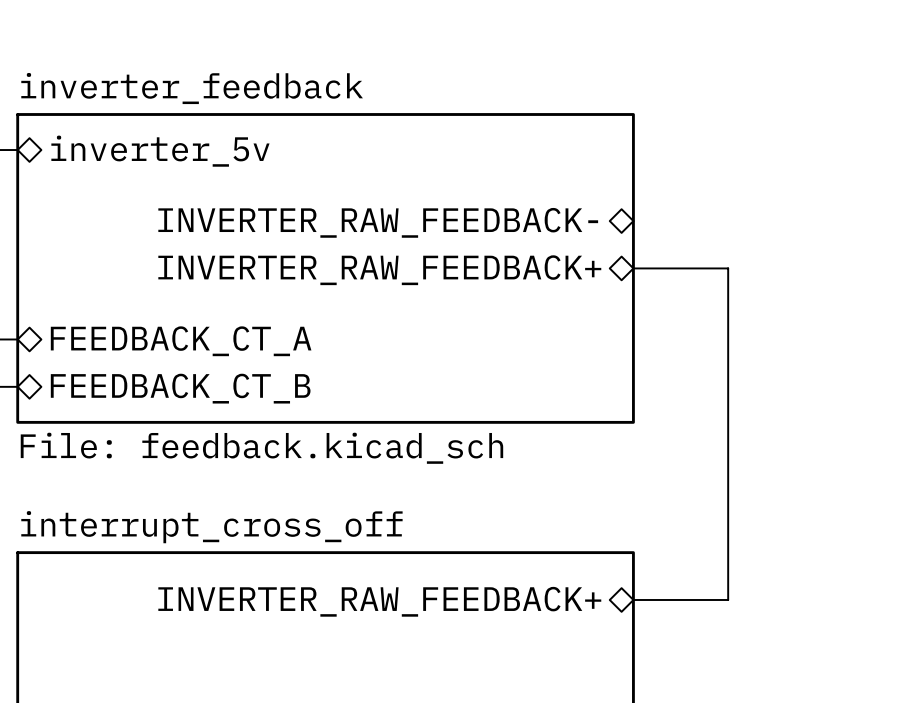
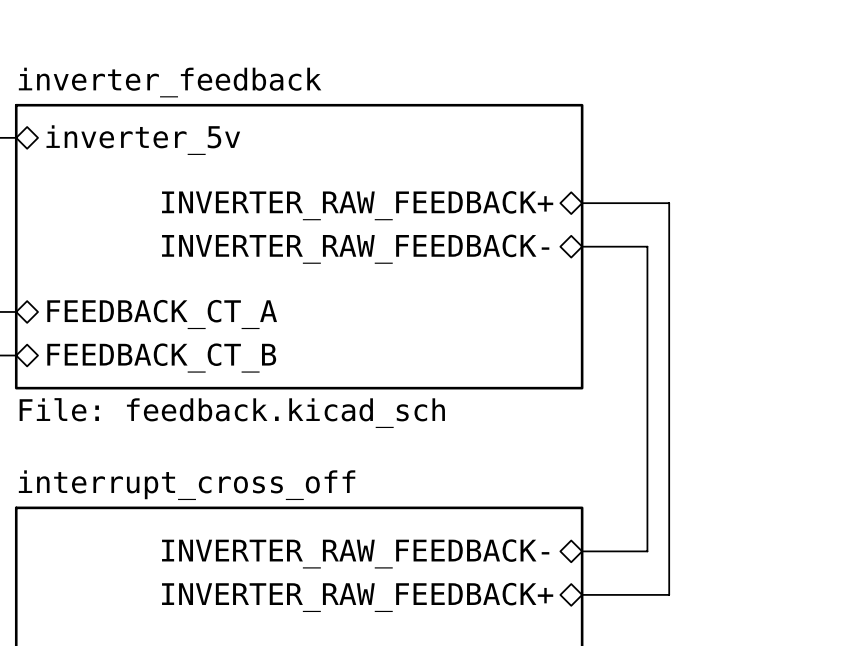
sheet pin: INVERTER_RAW_FEEDBACK- (378, 222) -> INVERTER_RAW_FEEDBACK+ (357, 205)
wire: (704, 268) (728, 268) -> (582, 203) (669, 203) (669, 246)
wire: none -> (647, 246) (647, 551)
sheet pin: INVERTER_RAW_FEEDBACK+ (379, 270) -> INVERTER_RAW_FEEDBACK- (355, 249)
wire: (704, 599) (728, 599) -> (582, 594) (669, 594) (669, 551)
sheet pin: INVERTER_RAW_FEEDBACK+ (379, 601) -> INVERTER_RAW_FEEDBACK- (355, 553)
sheet pin: none -> INVERTER_RAW_FEEDBACK+ (357, 597)

